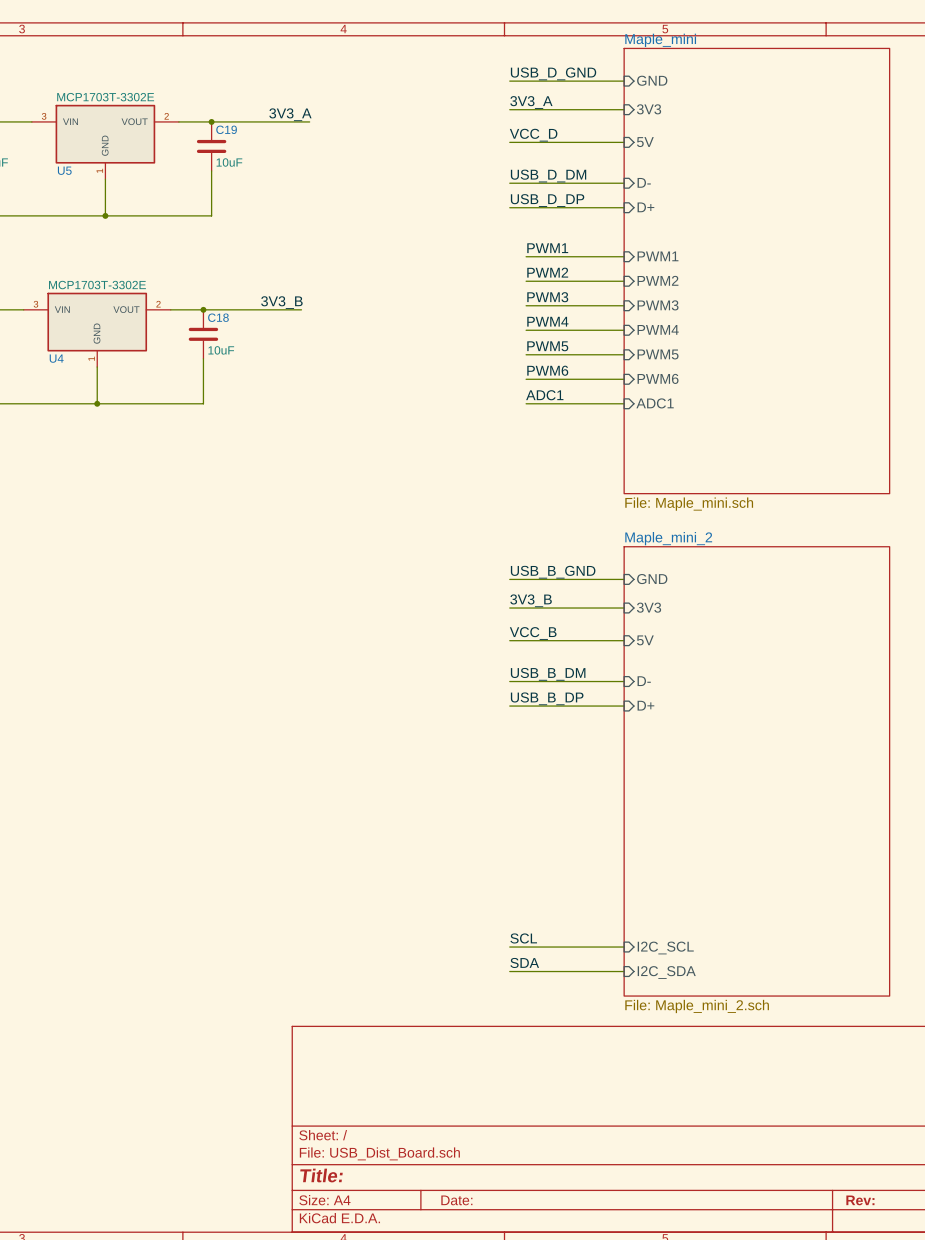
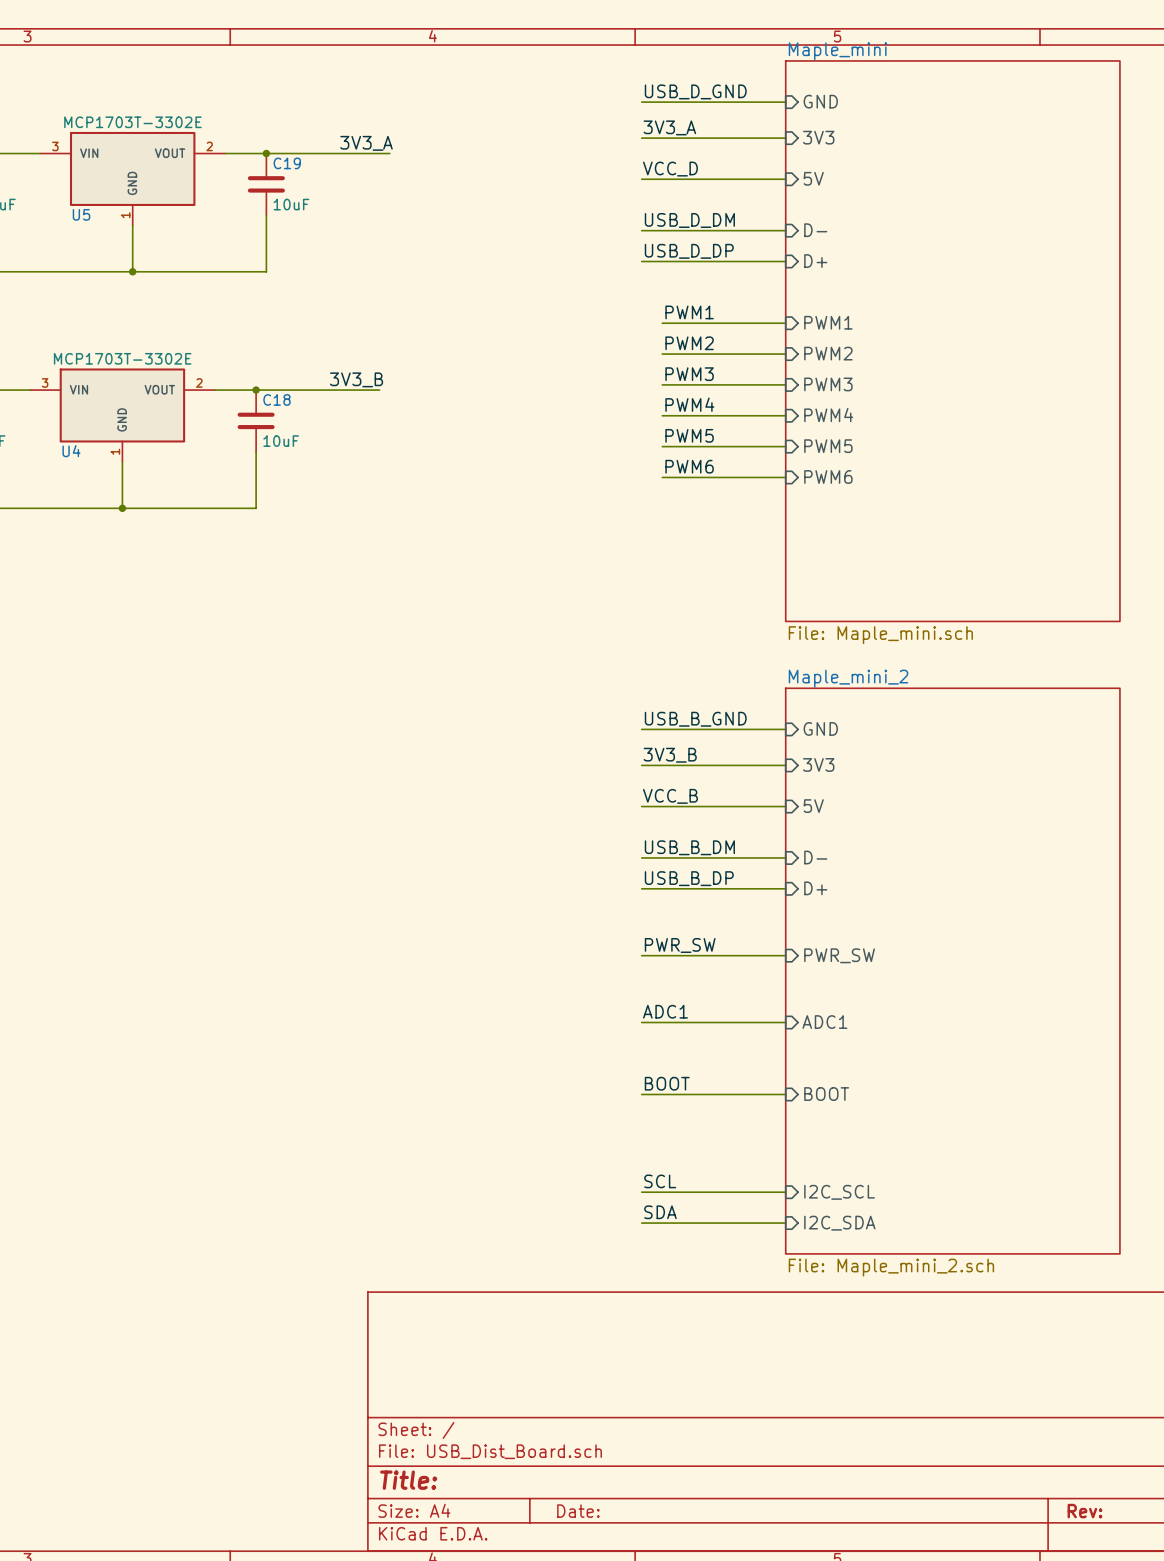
label: ADC1 (544, 395) -> none
wire: (526, 403) (624, 403) -> none
sheet pin: ADC1 (655, 403) -> none
label: none -> PWR_SW (680, 945)
wire: none -> (641, 955) (785, 955)
sheet pin: none -> PWR_SW (839, 955)
label: none -> ADC1 (665, 1011)
sheet pin: none -> ADC1 (824, 1022)
wire: none -> (641, 1022) (785, 1022)
label: none -> BOOT (667, 1083)
wire: none -> (641, 1094) (785, 1094)
sheet pin: none -> BOOT (826, 1094)

